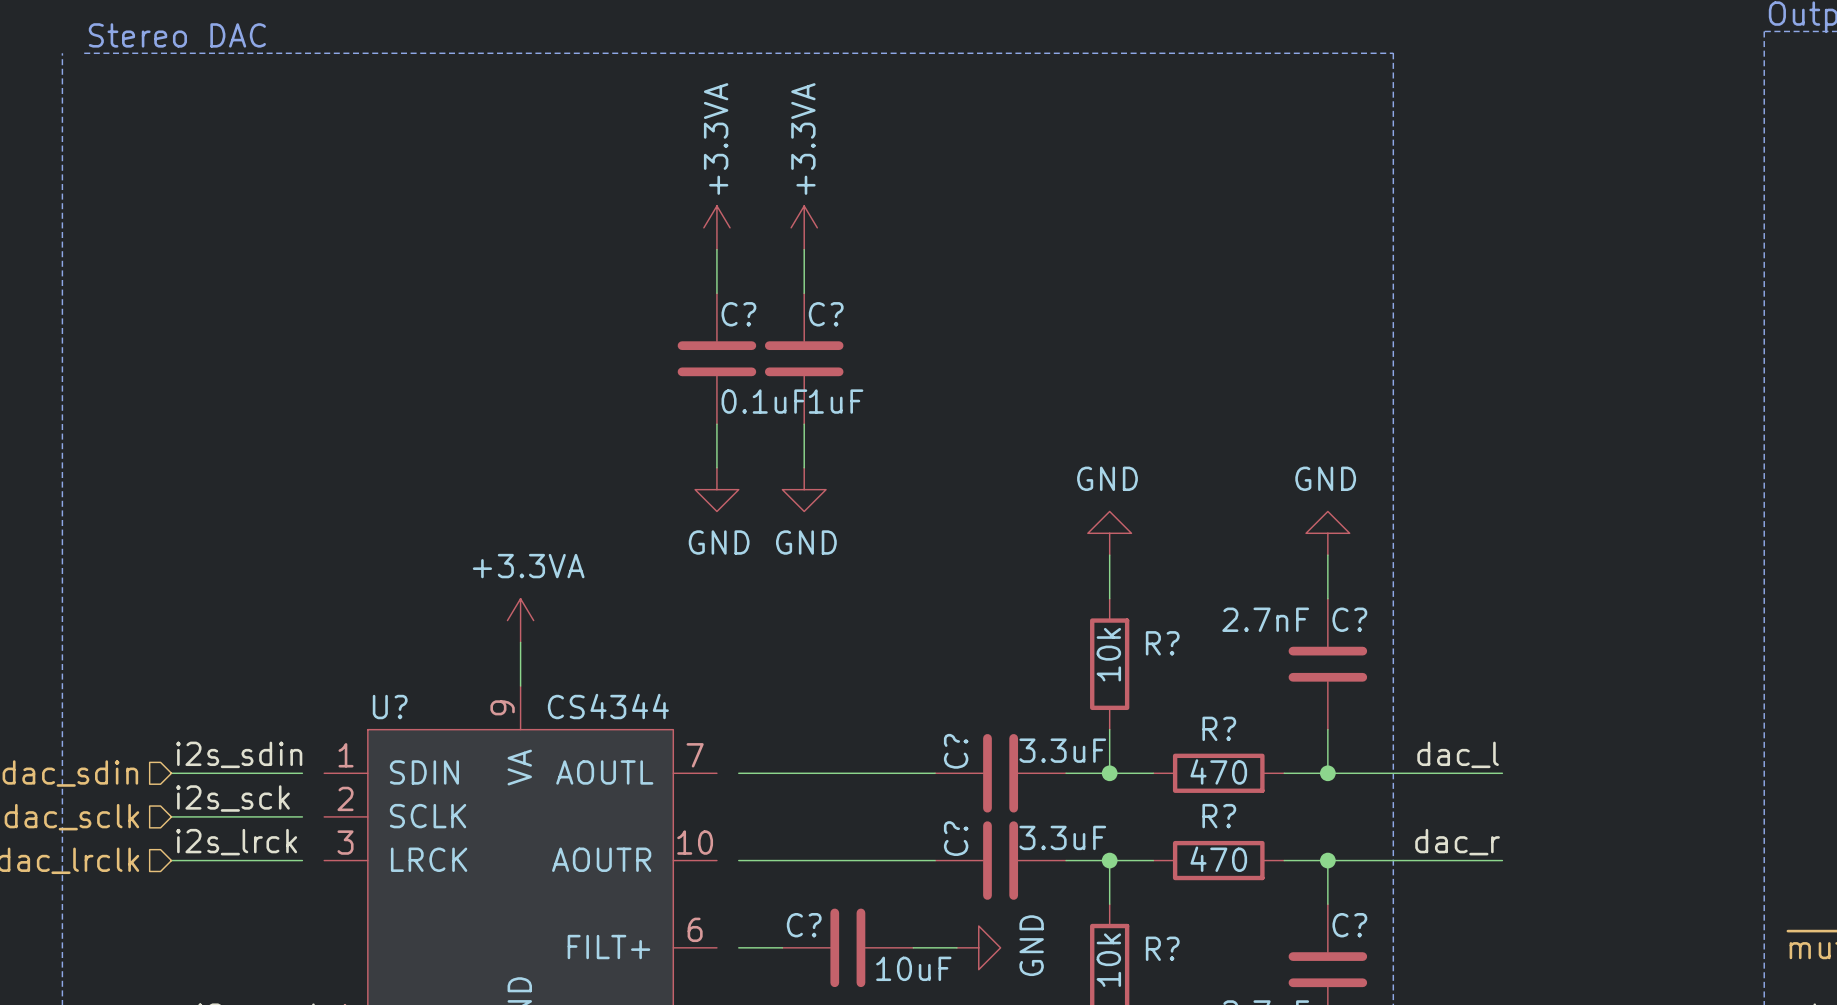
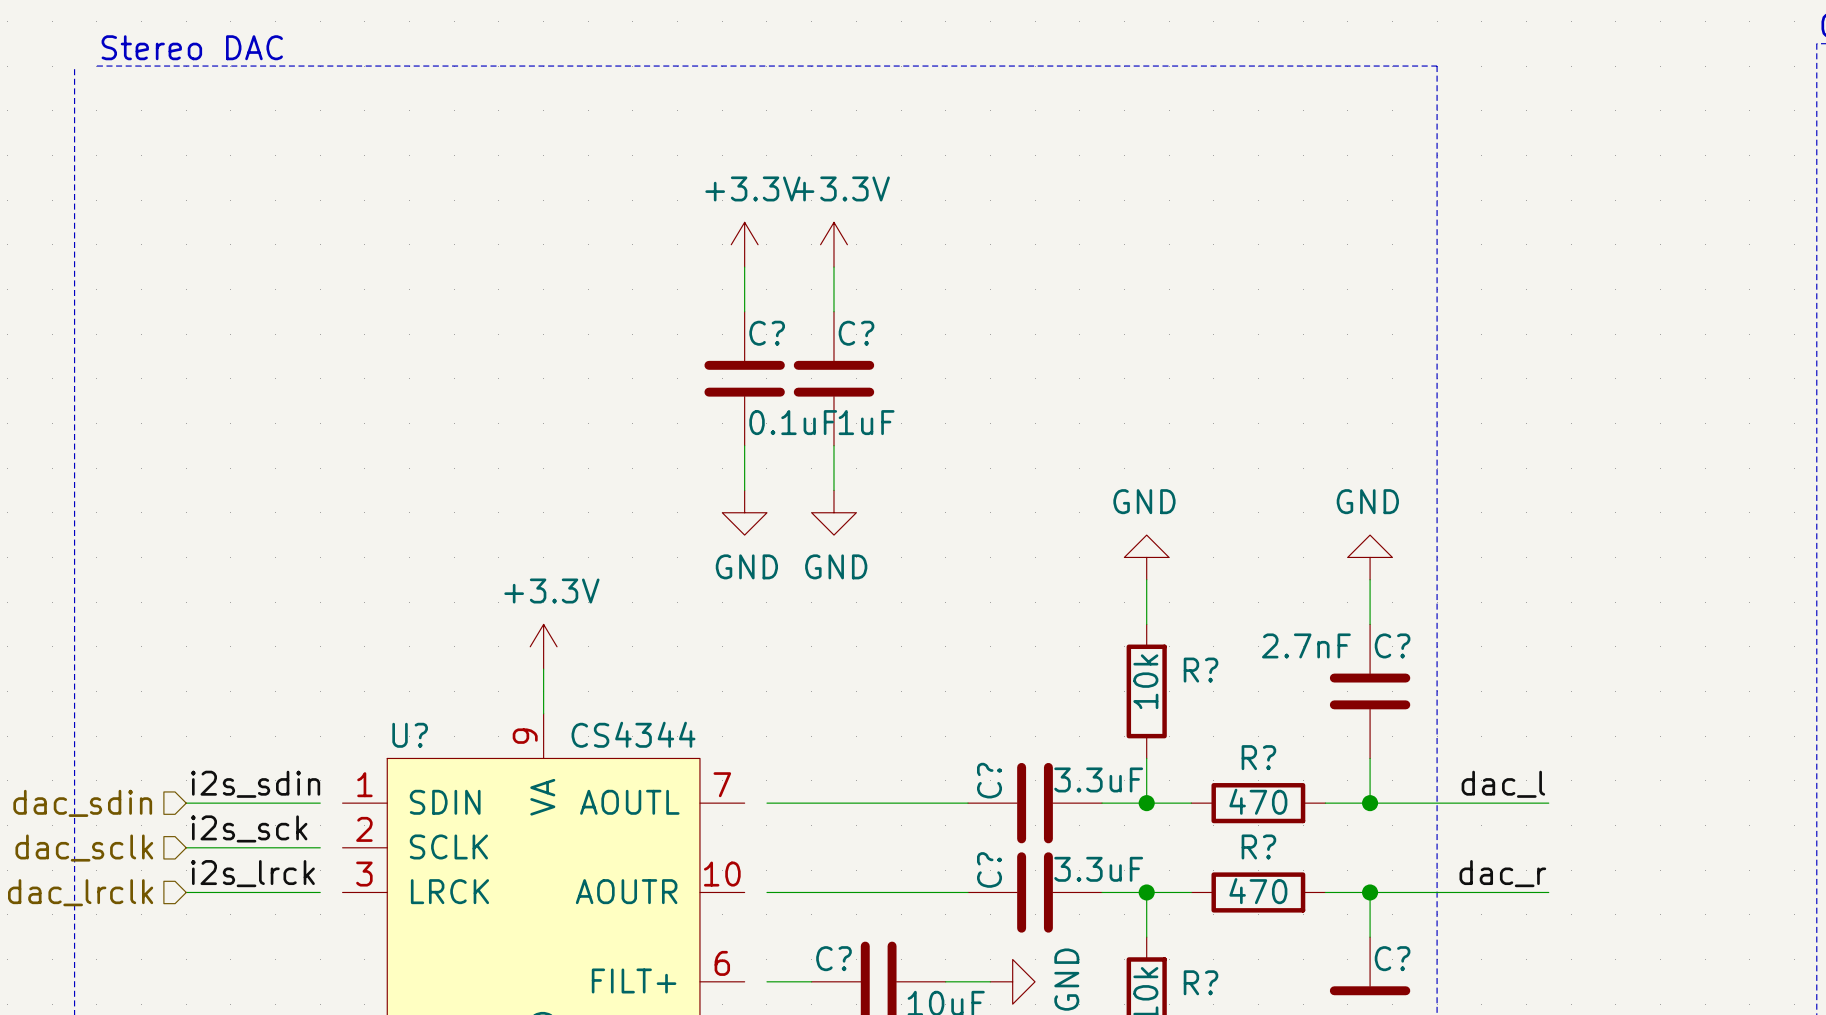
power symbol: +3.3VA (716, 227) -> +3.3V (744, 244)
power symbol: +3.3VA (804, 227) -> +3.3V (833, 244)
power symbol: +3.3VA (520, 620) -> +3.3V (543, 646)

